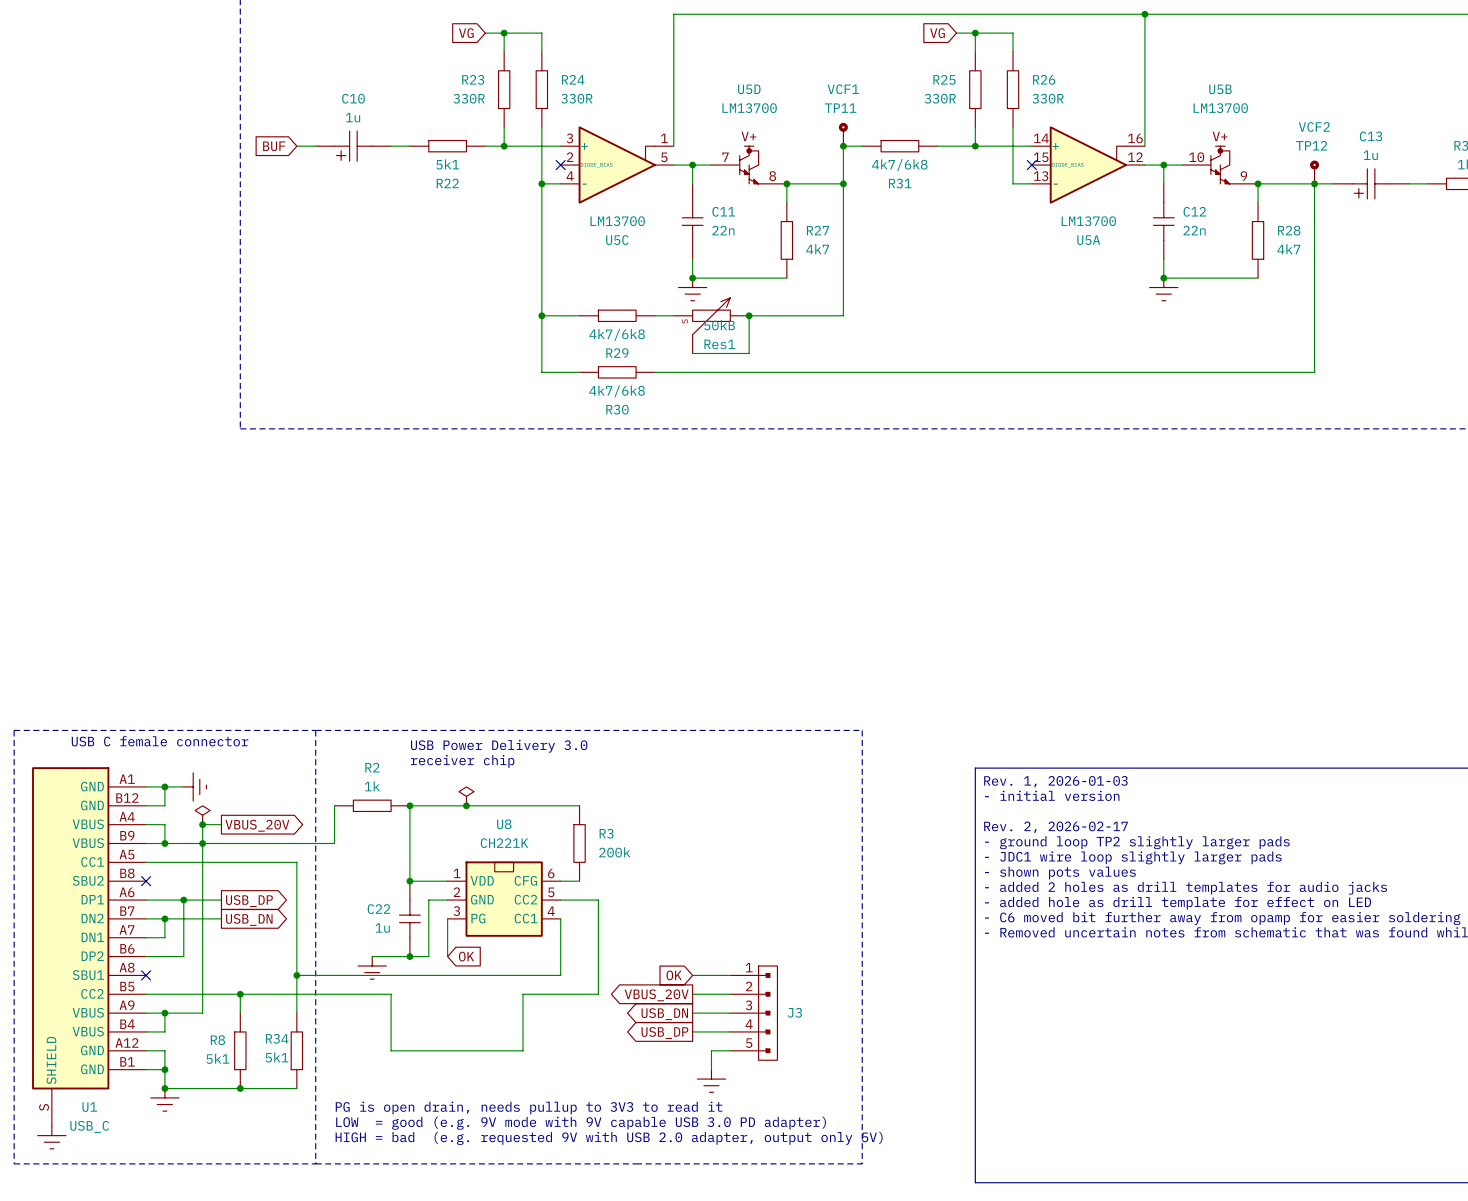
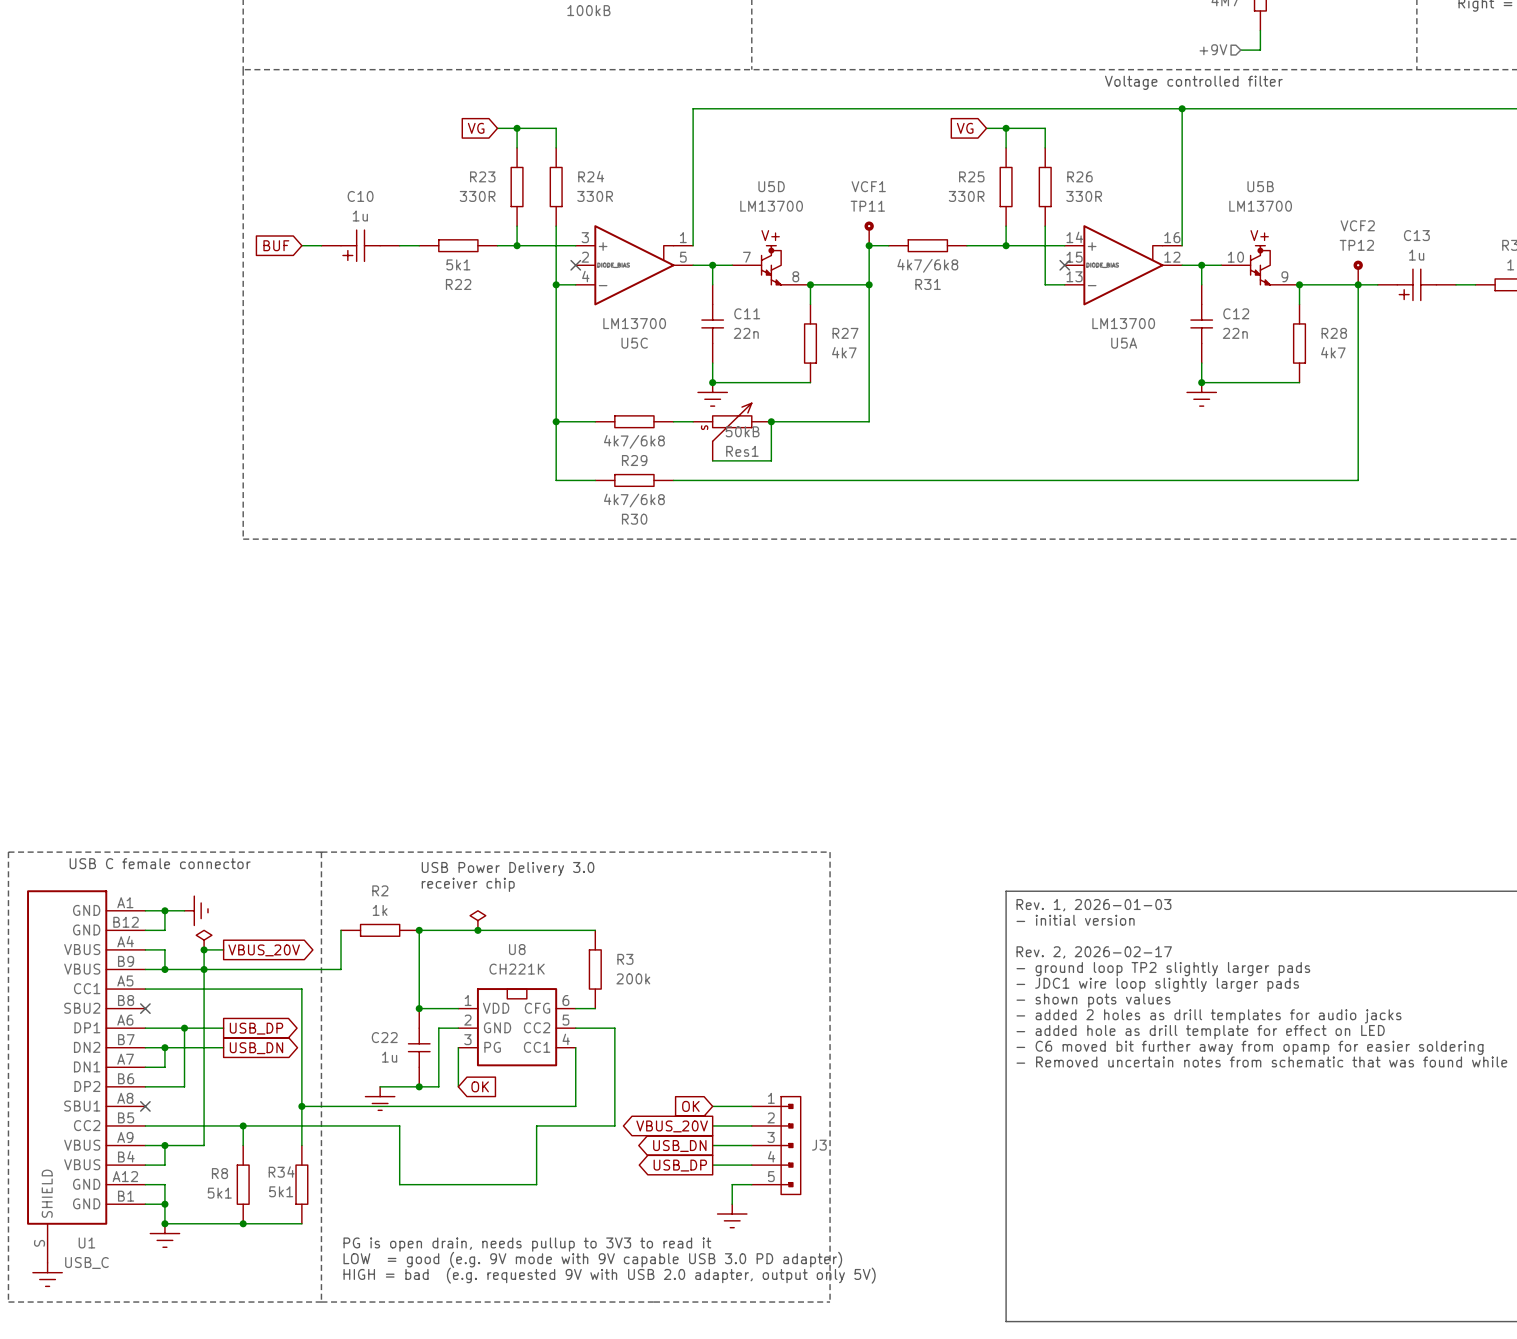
line: (805, 730) (862, 730) (862, 1163) (805, 1163) -> (830, 852) (830, 1302)

